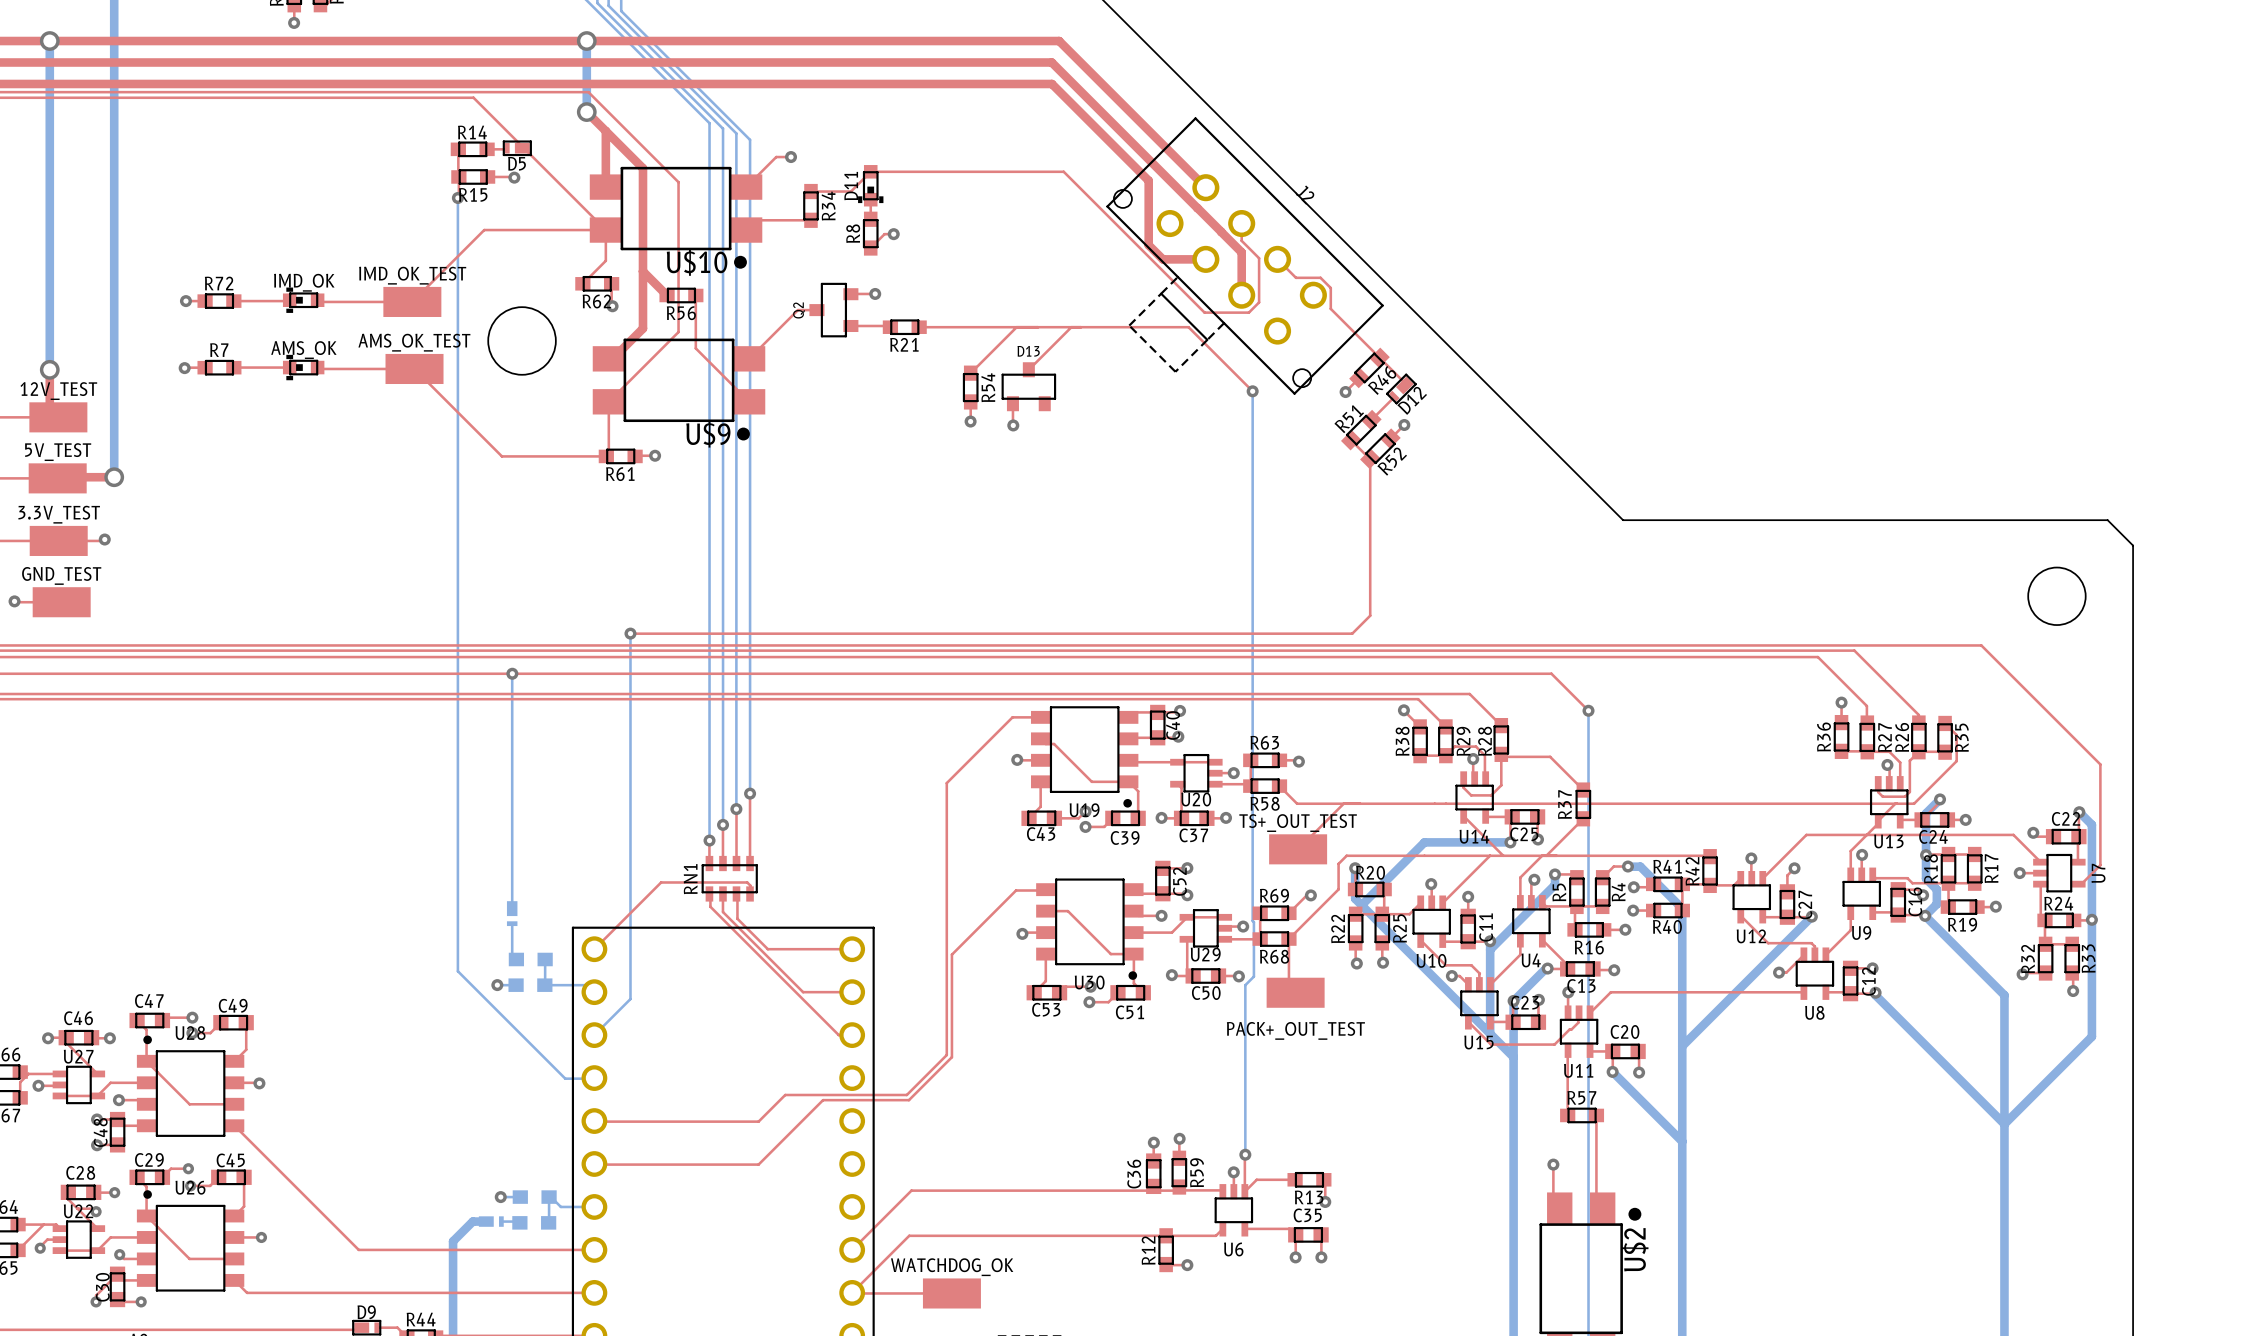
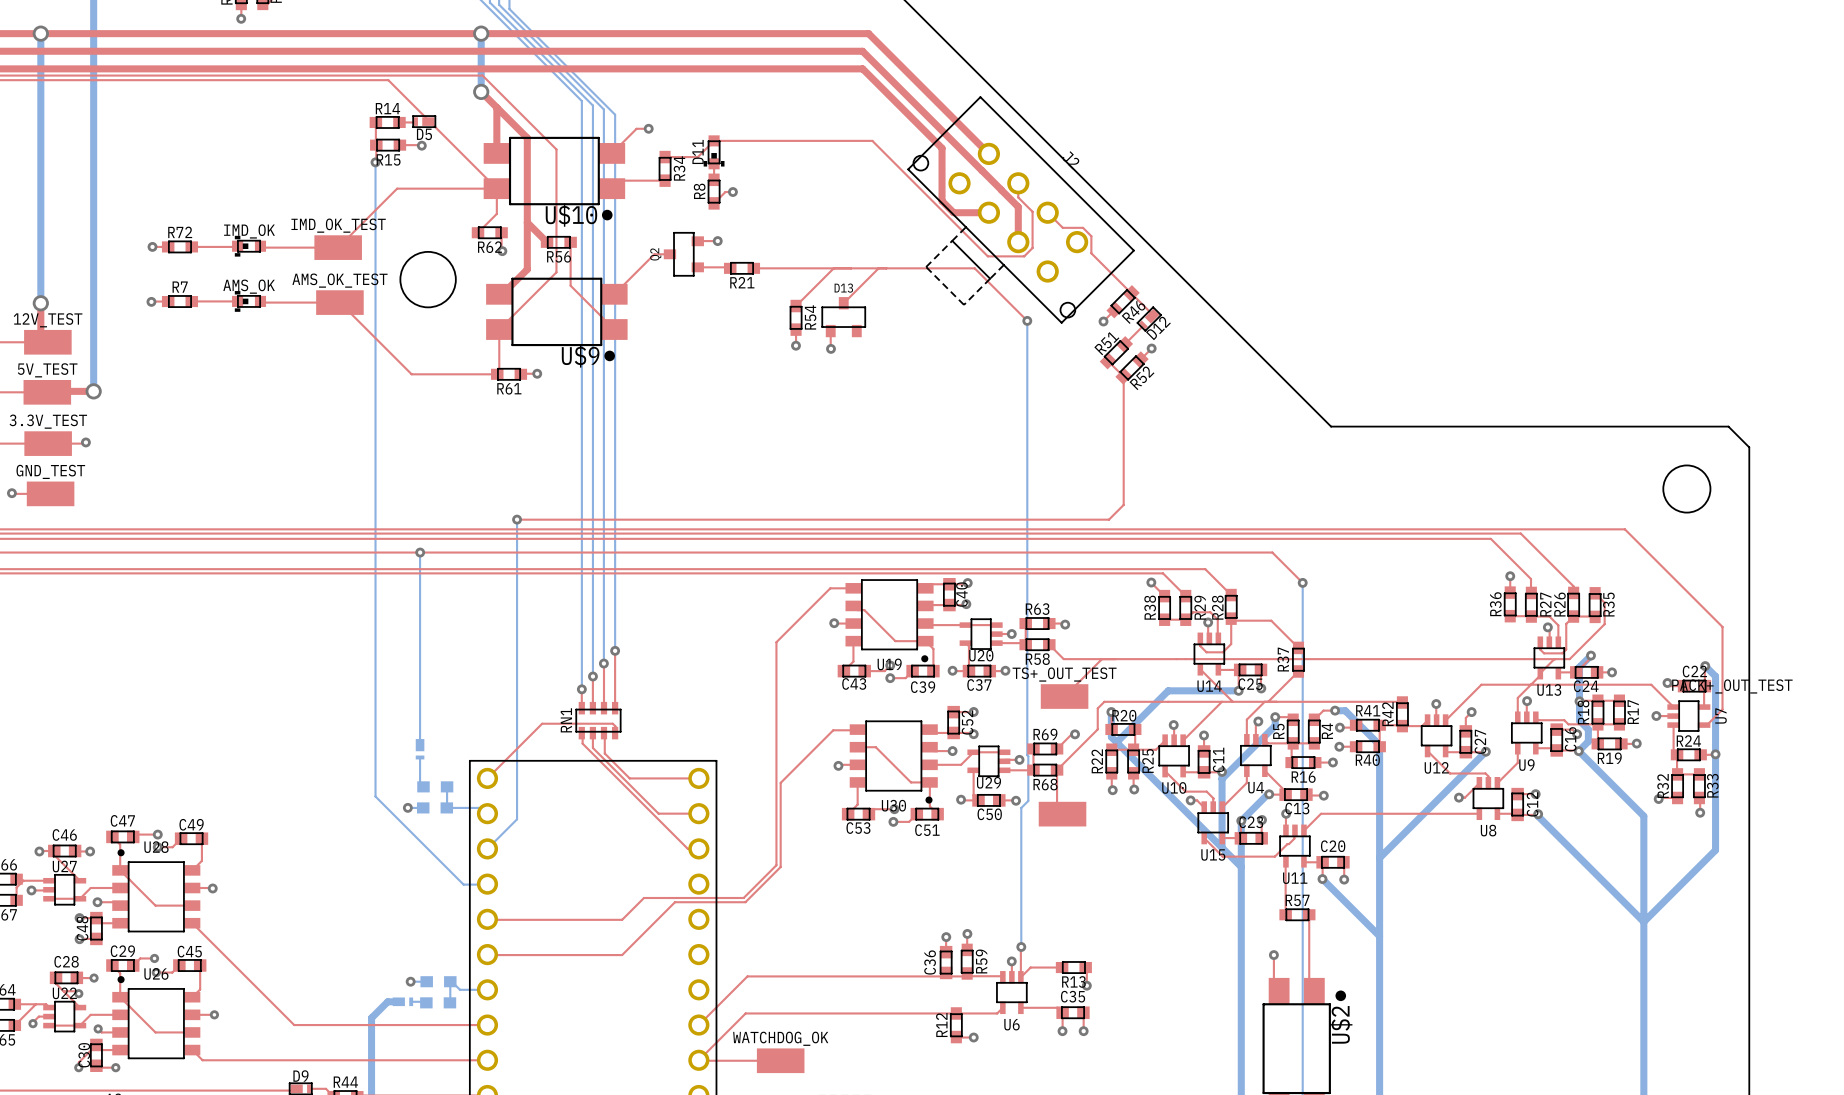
PACK+_OUT_TEST name position: PACK+_OUT_TEST (1295, 1030) -> PACK+_OUT_TEST (1732, 686)

